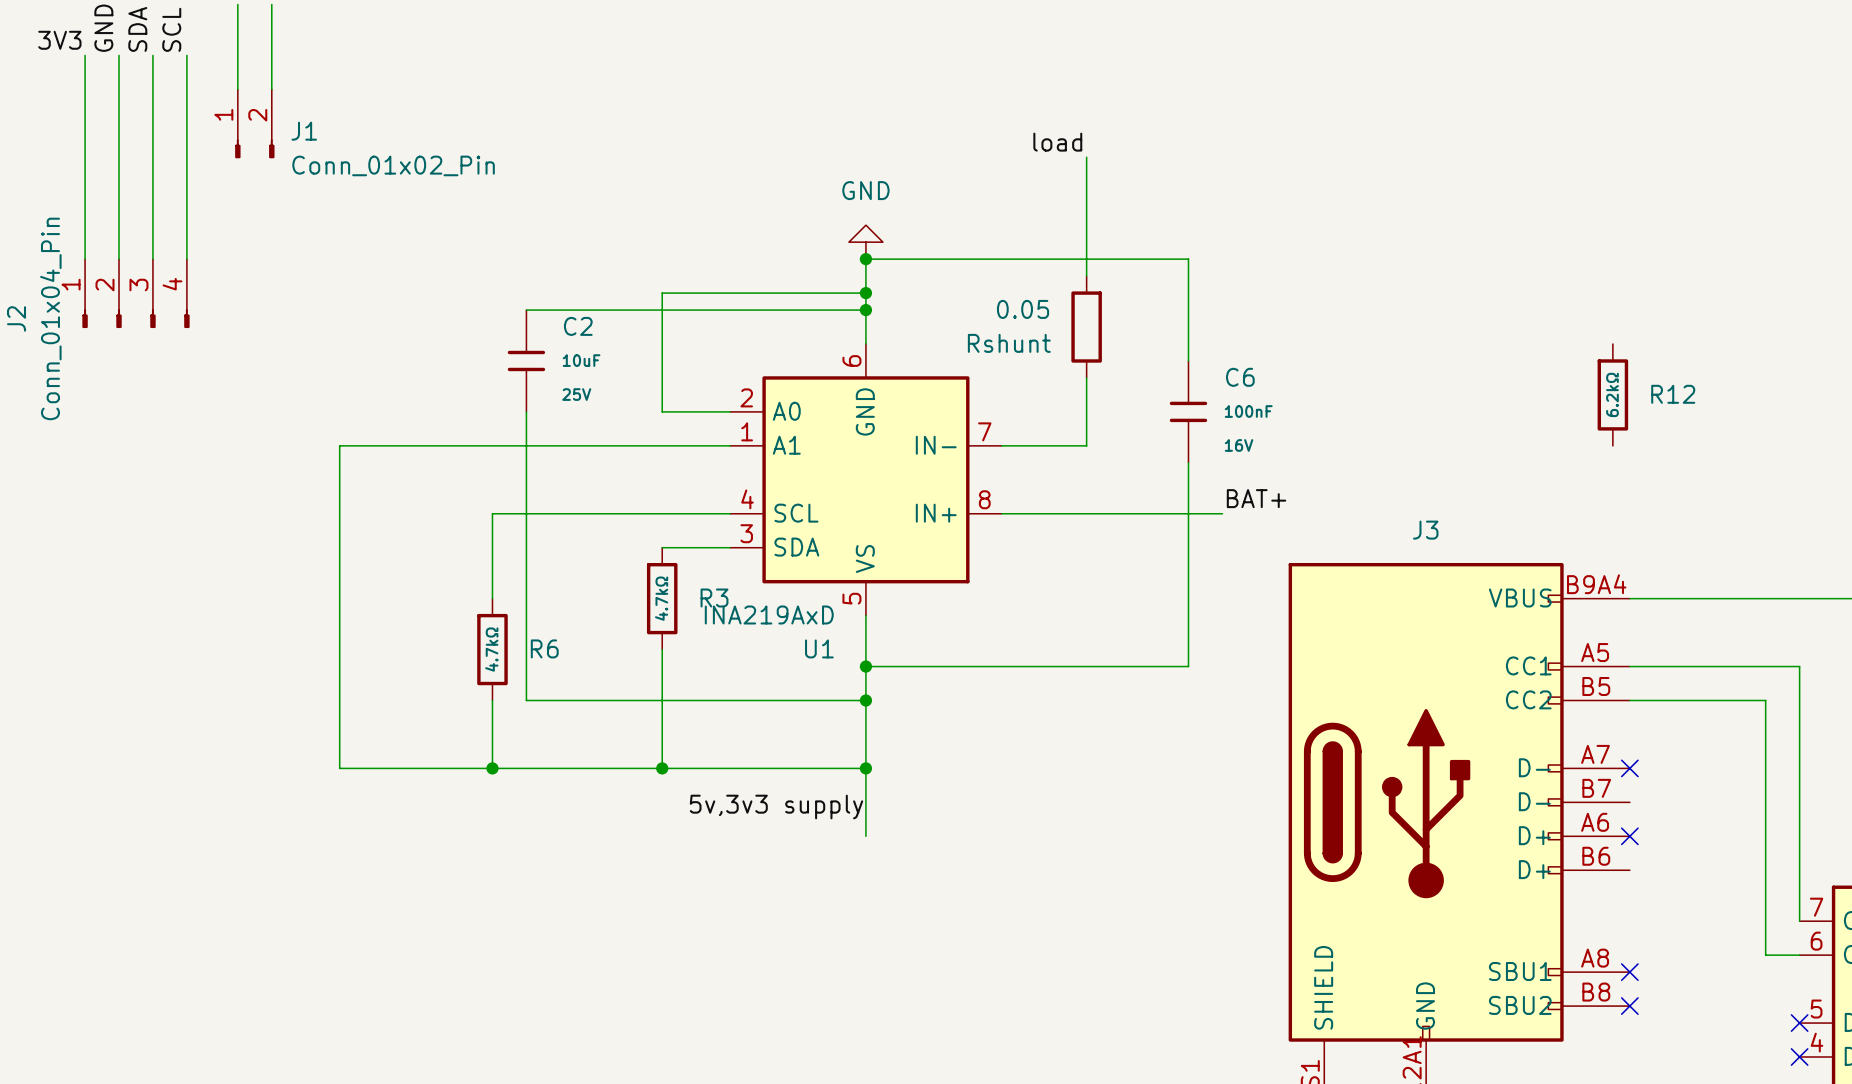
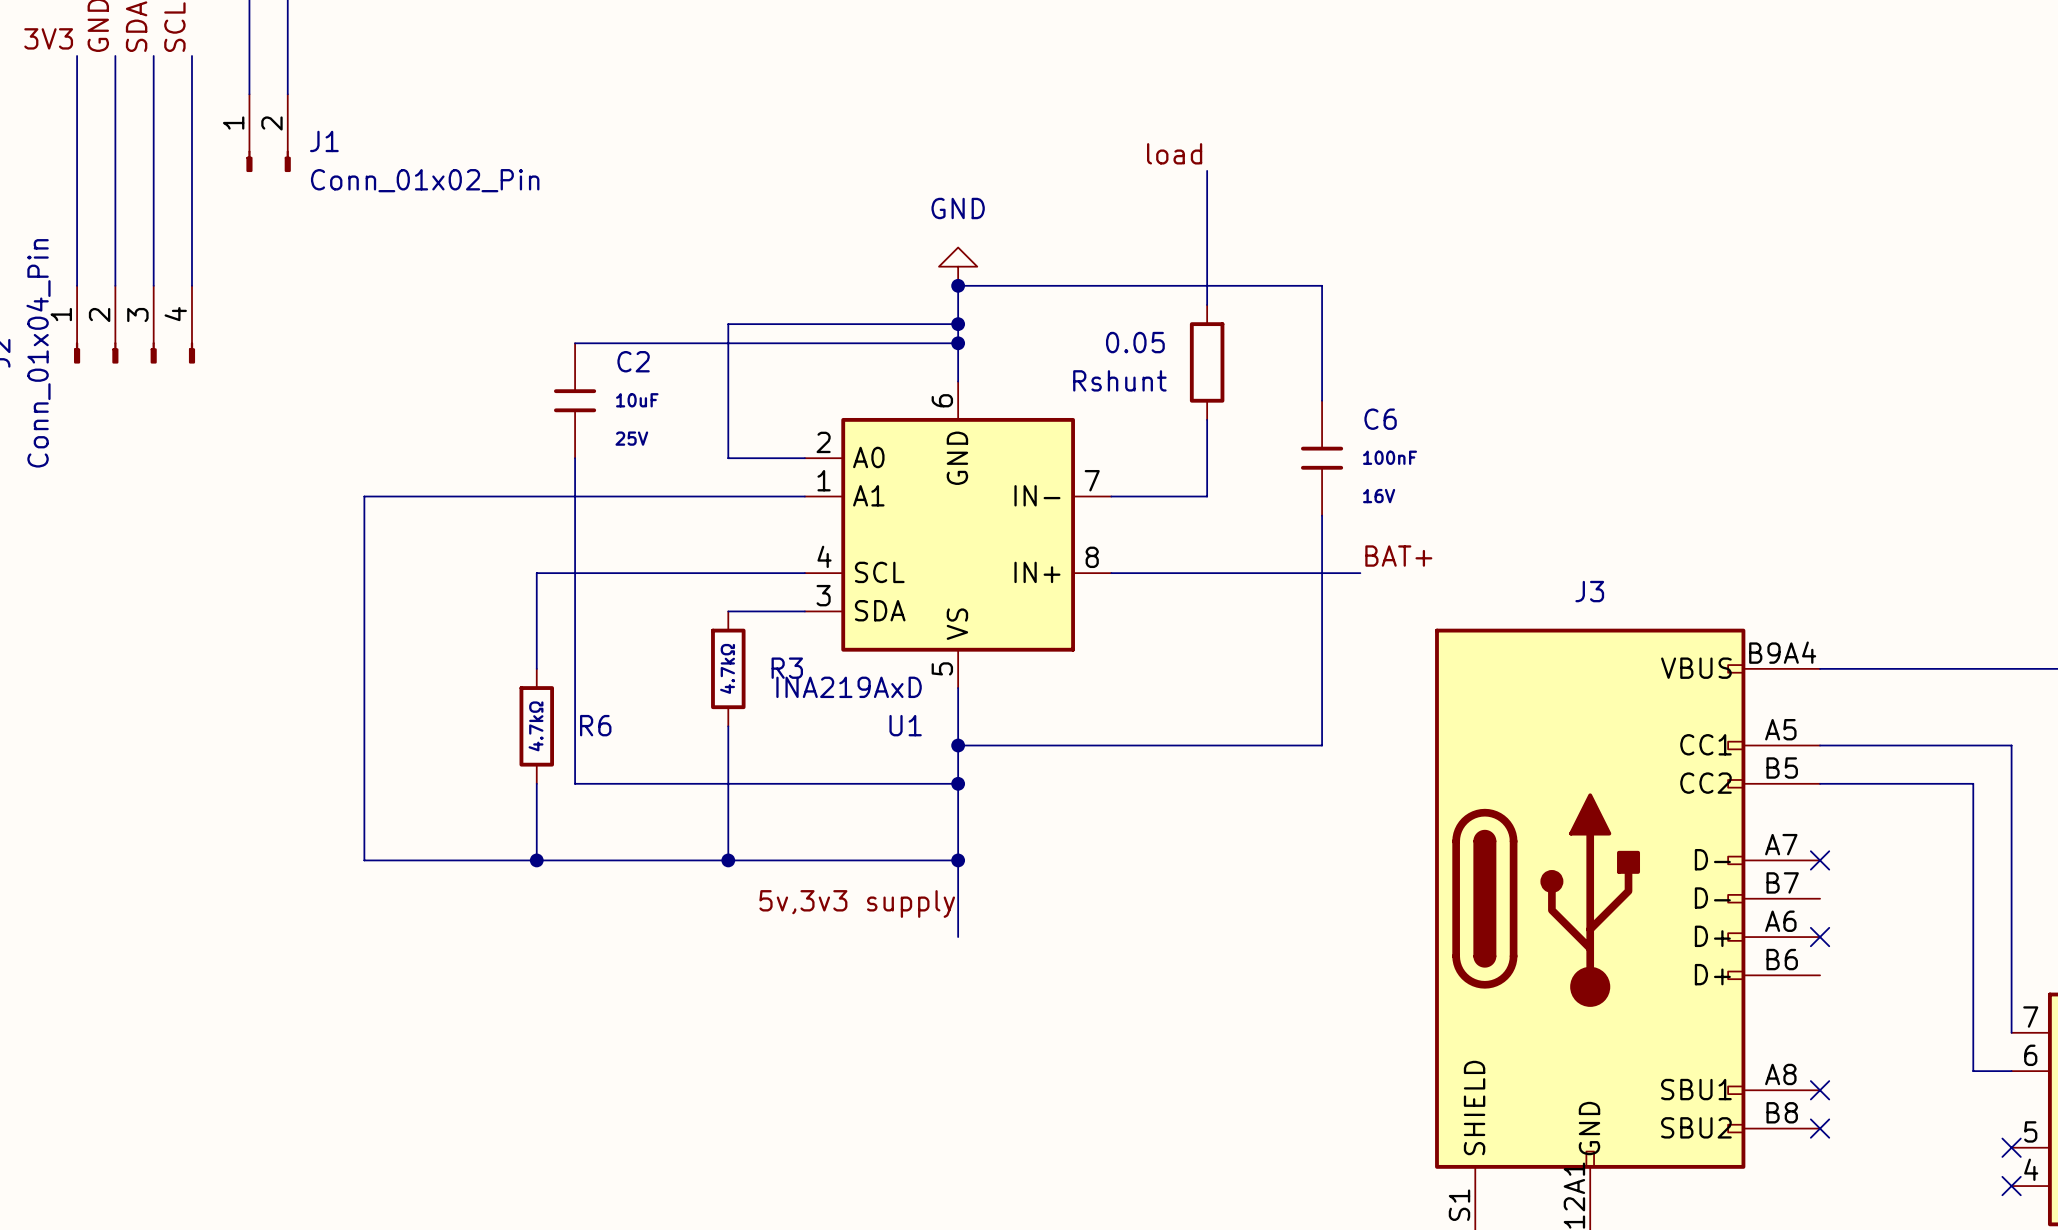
R12: 6.2kΩ (1612, 394) -> none

